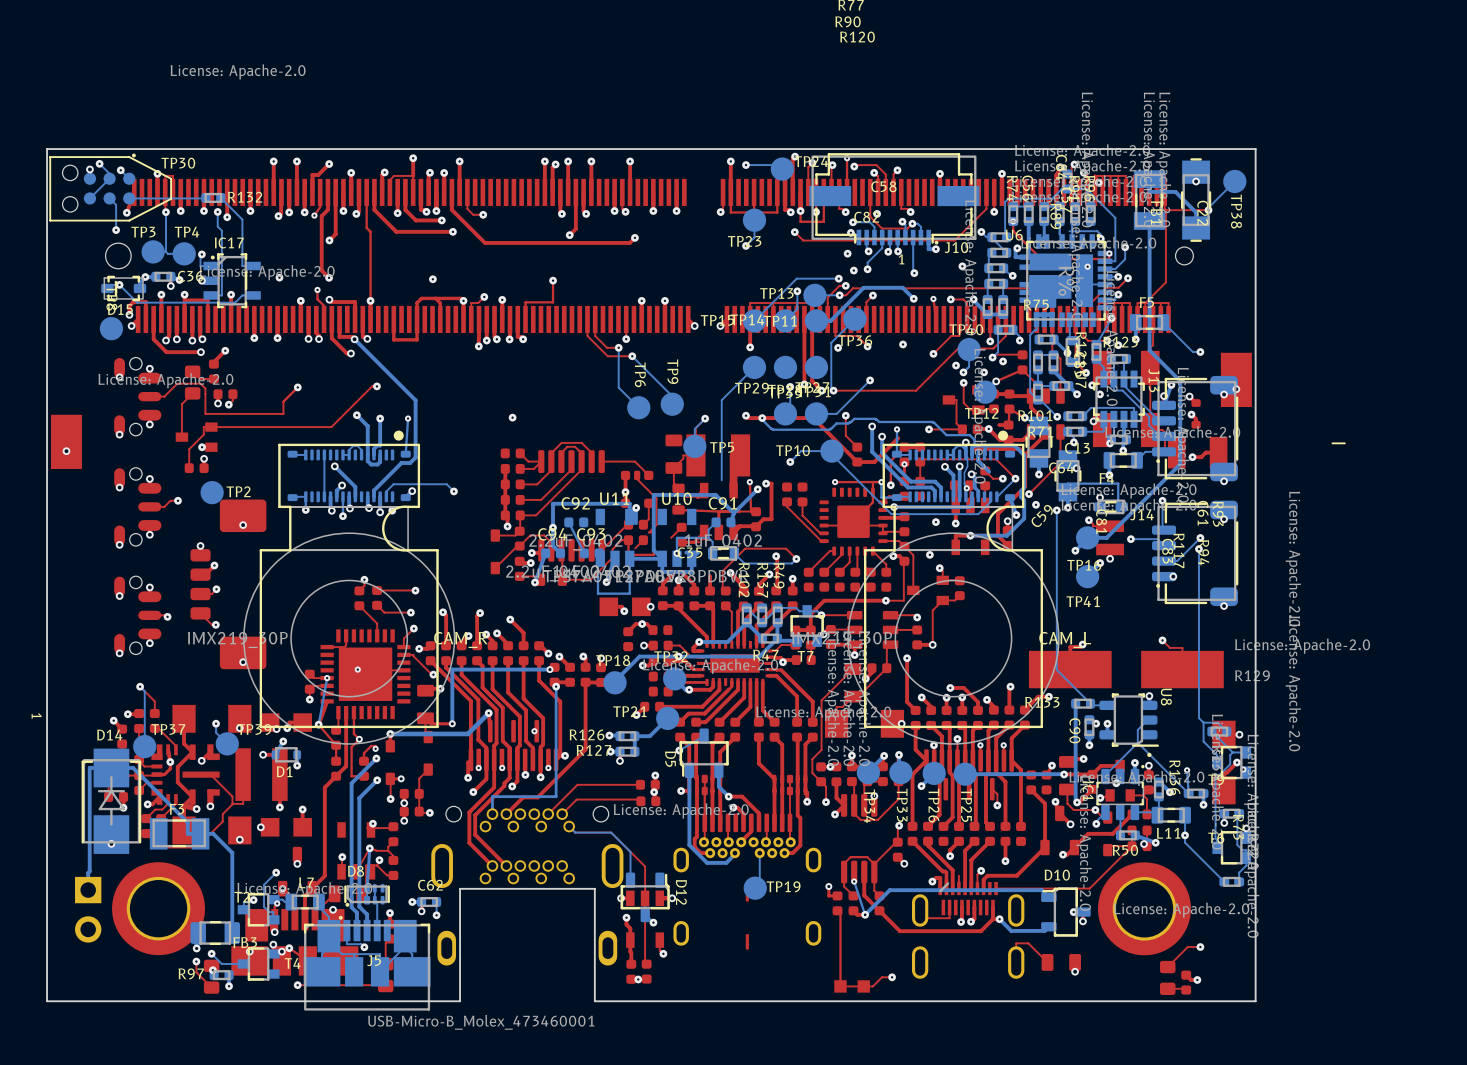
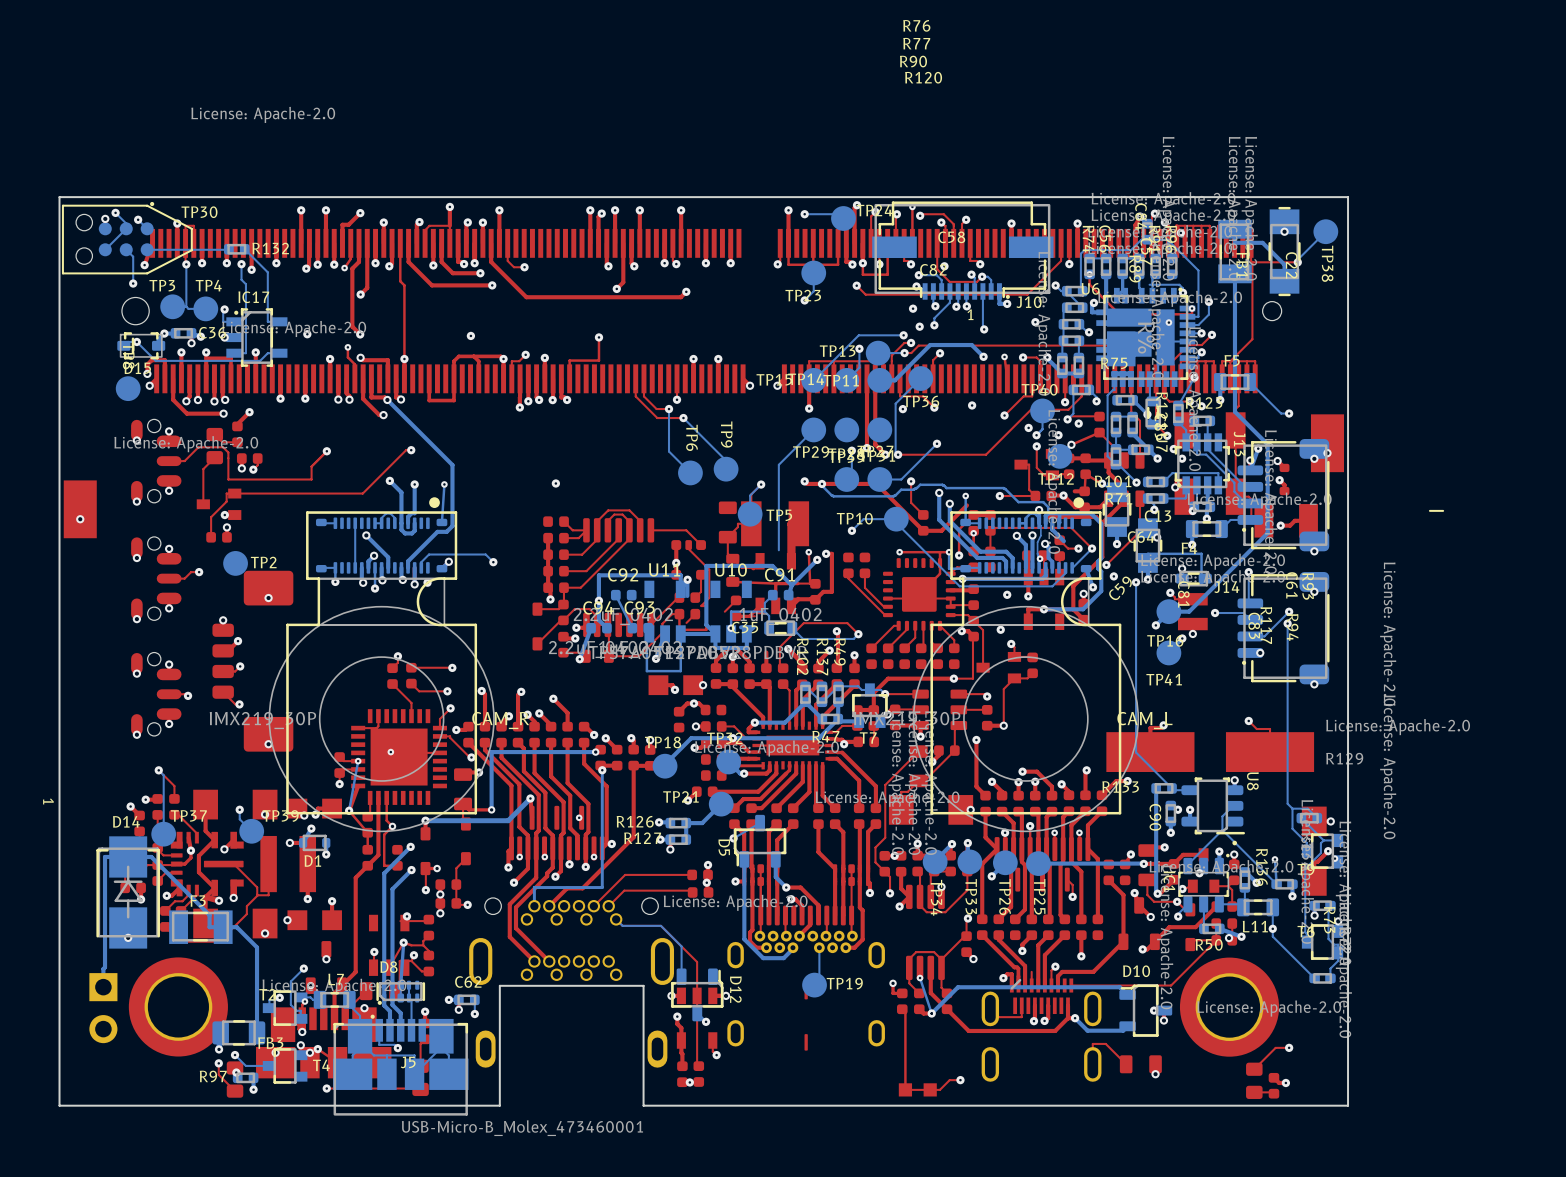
top track: (375, 748) (375, 746) (371, 746) (364, 753) (364, 761) -> none
via: (375, 748) -> none

